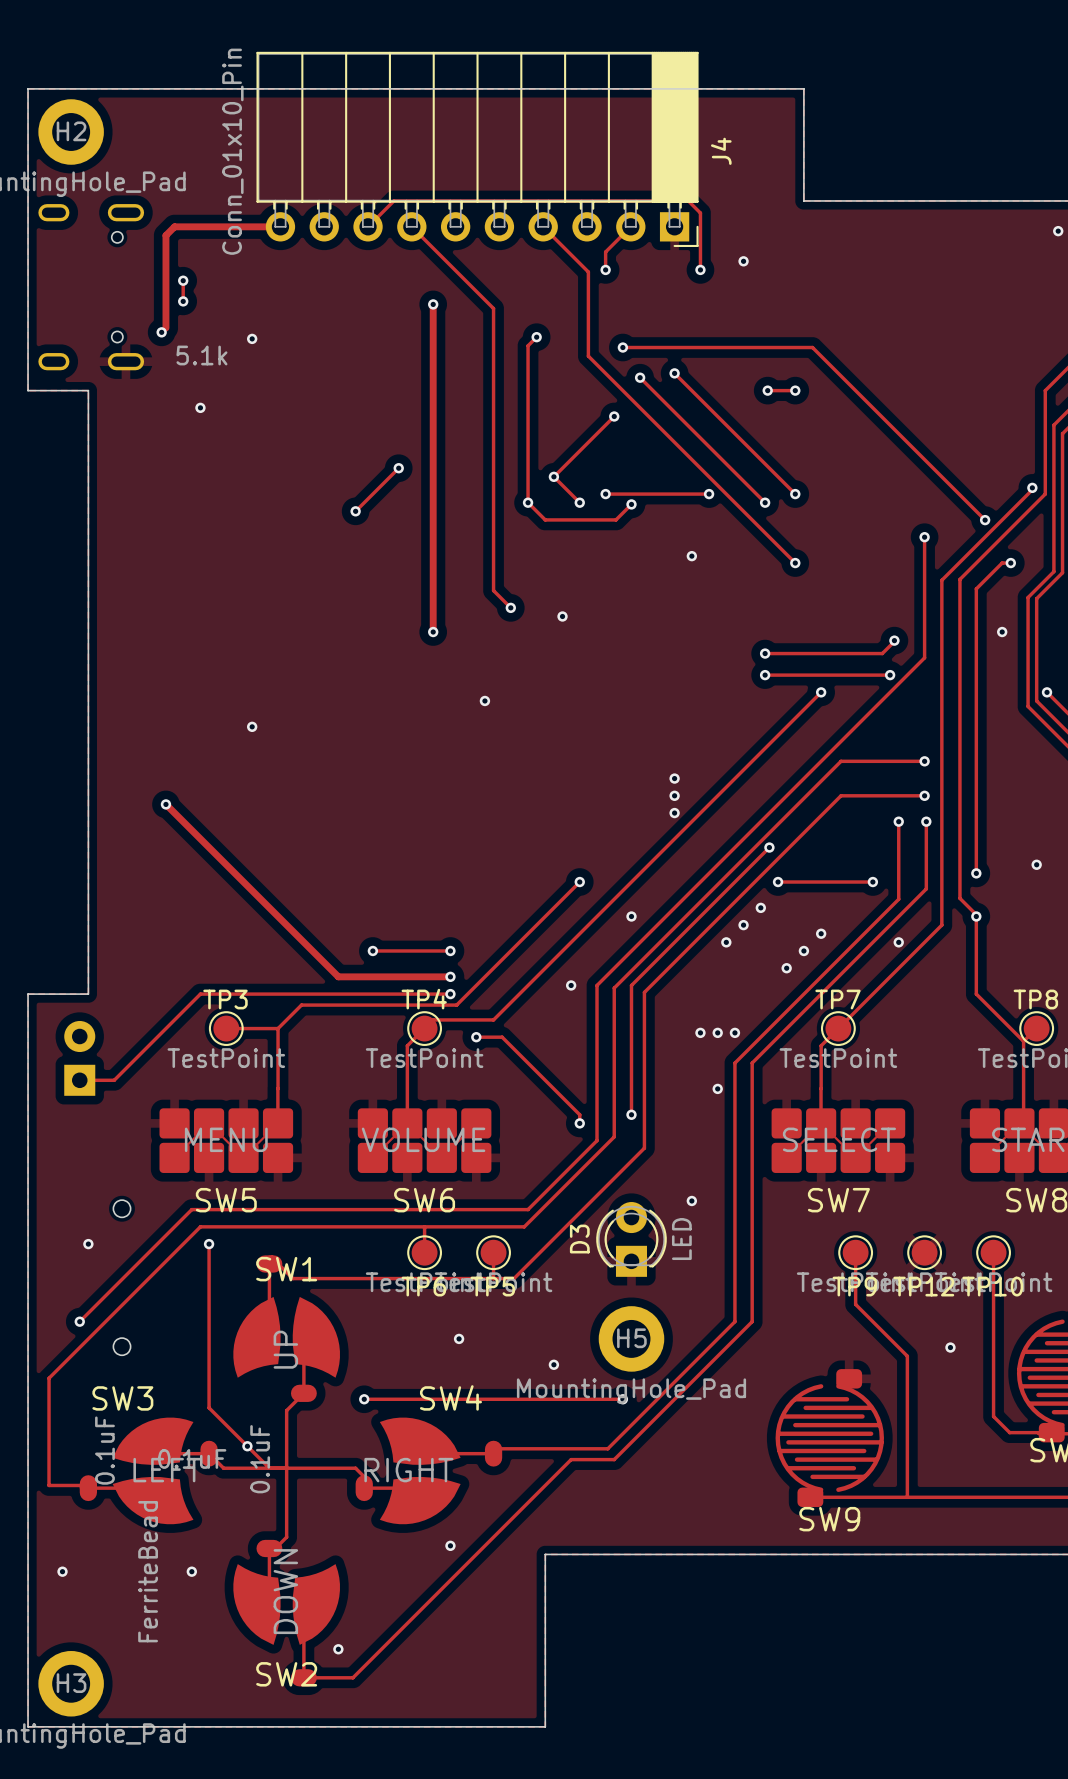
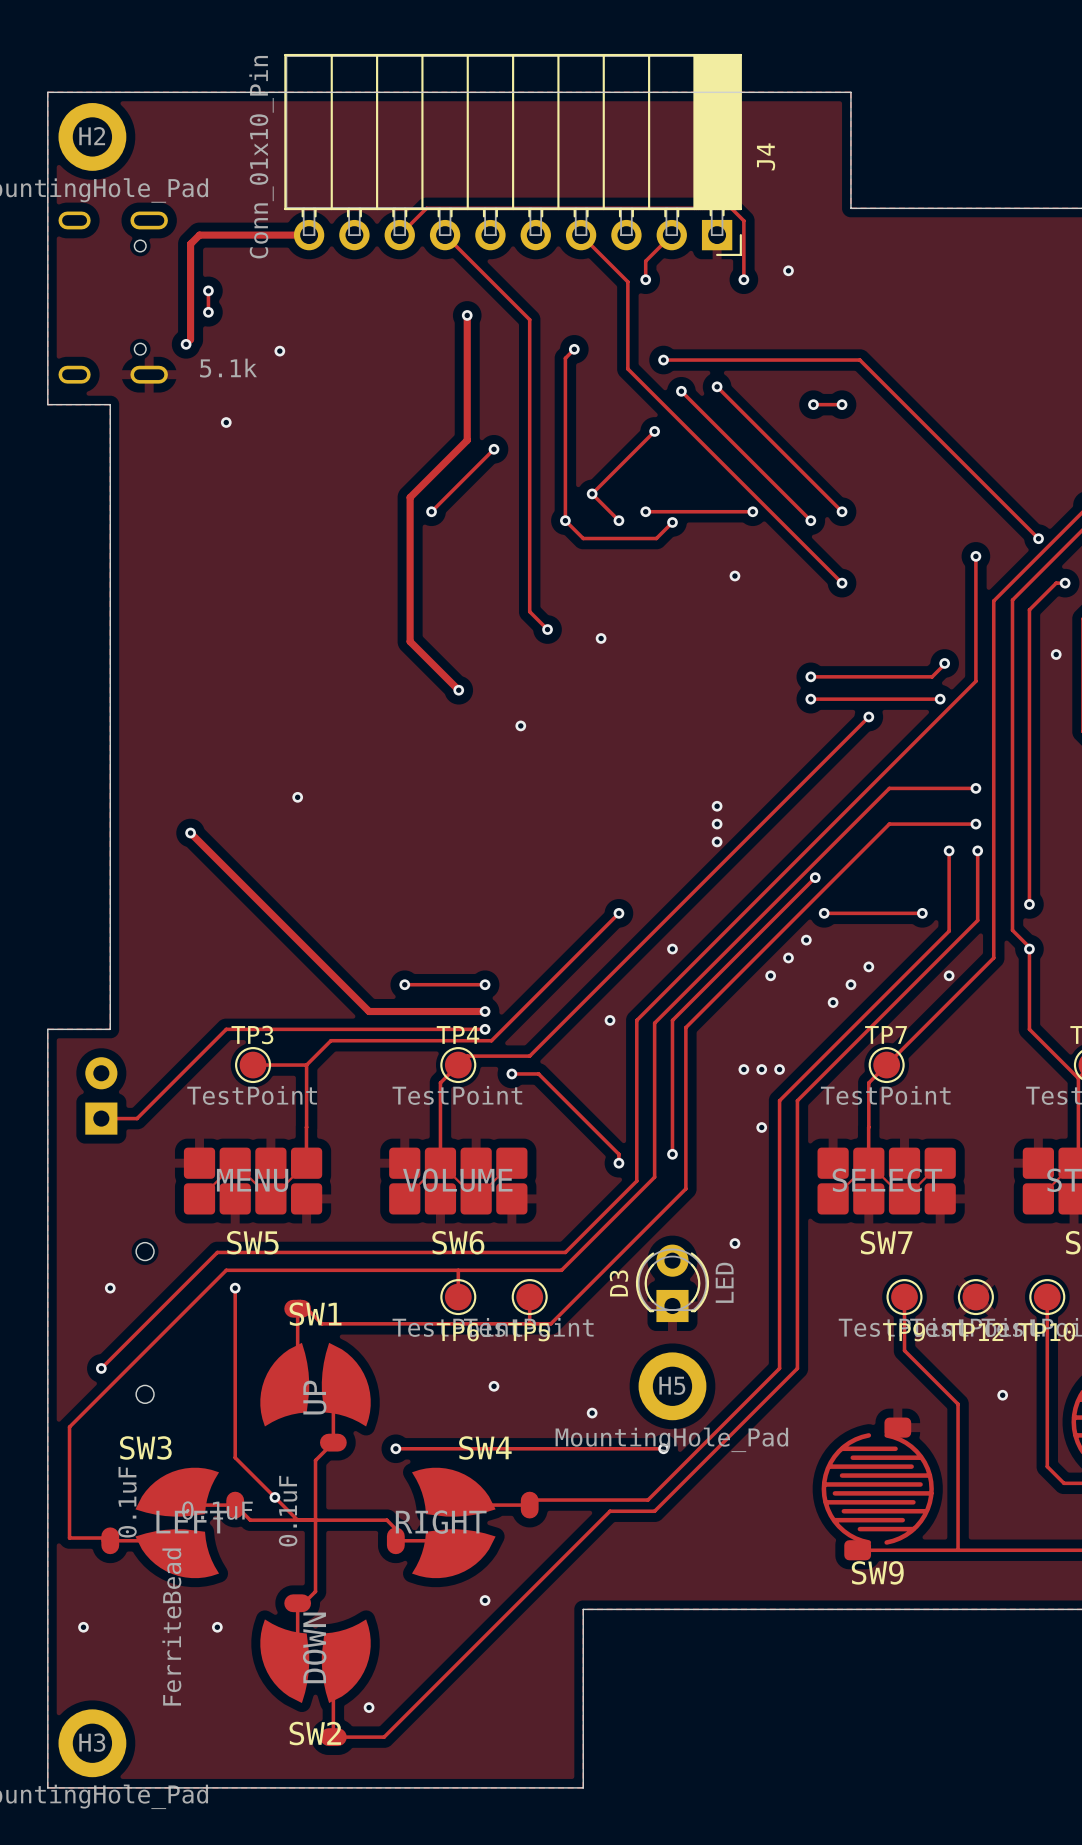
track: (433, 425) (433, 632) -> (467, 440) (410, 497) (410, 641) (458, 690)
track: none -> (494, 449) (431, 511)
via: none -> (494, 449)
track: (398, 468) (355, 511) -> none
via: (398, 468) -> none
via: none -> (431, 511)
via: (355, 511) -> none
via position: (433, 632) -> (458, 690)
via position: (252, 726) -> (297, 797)

